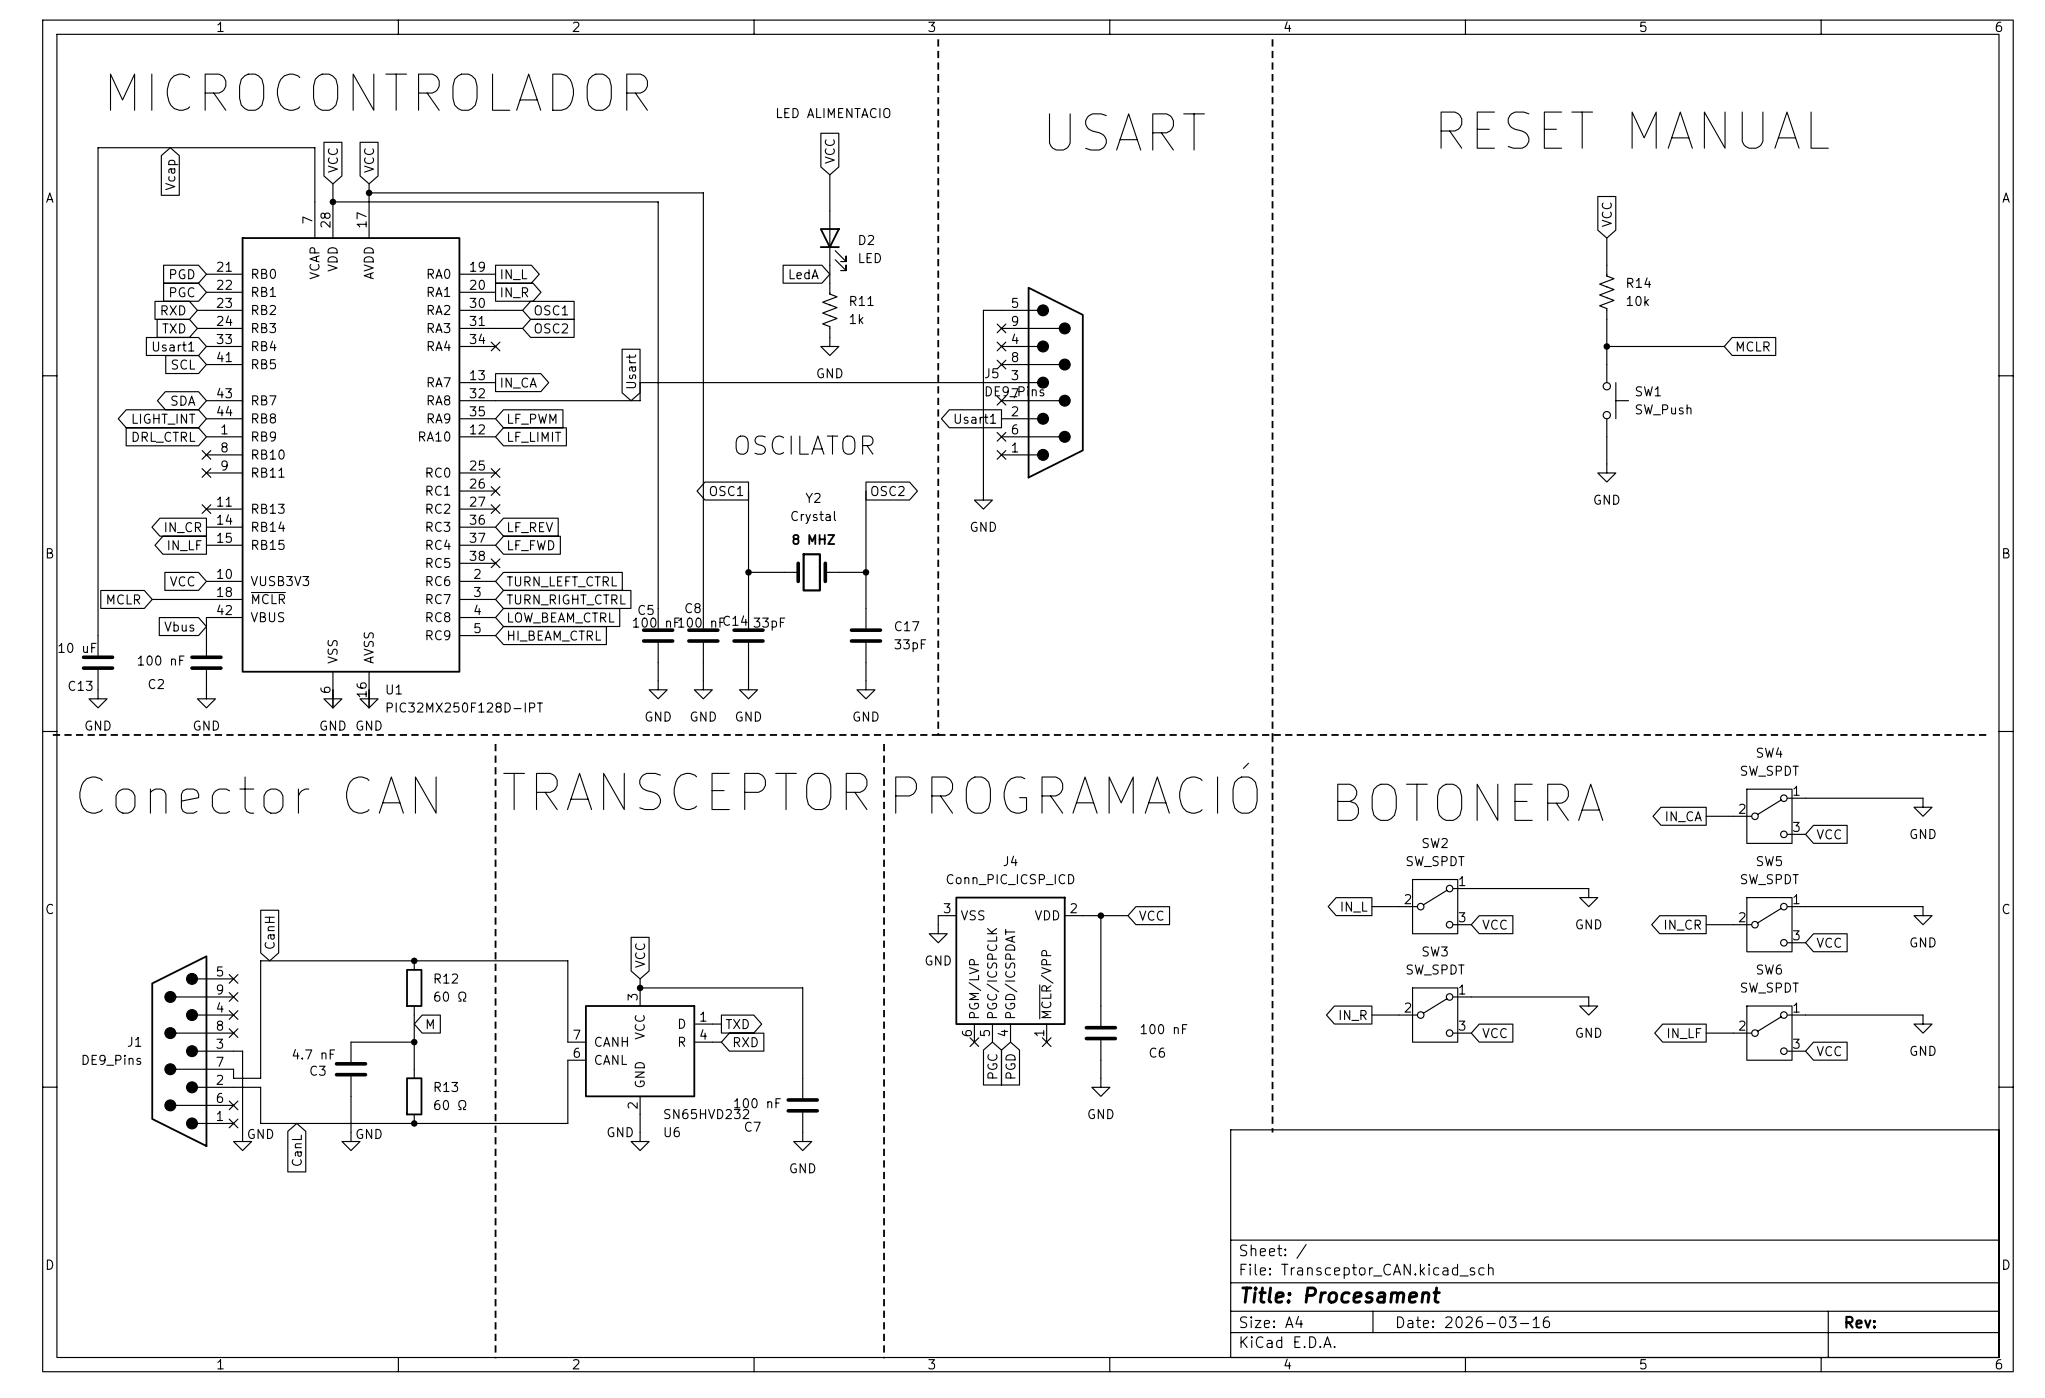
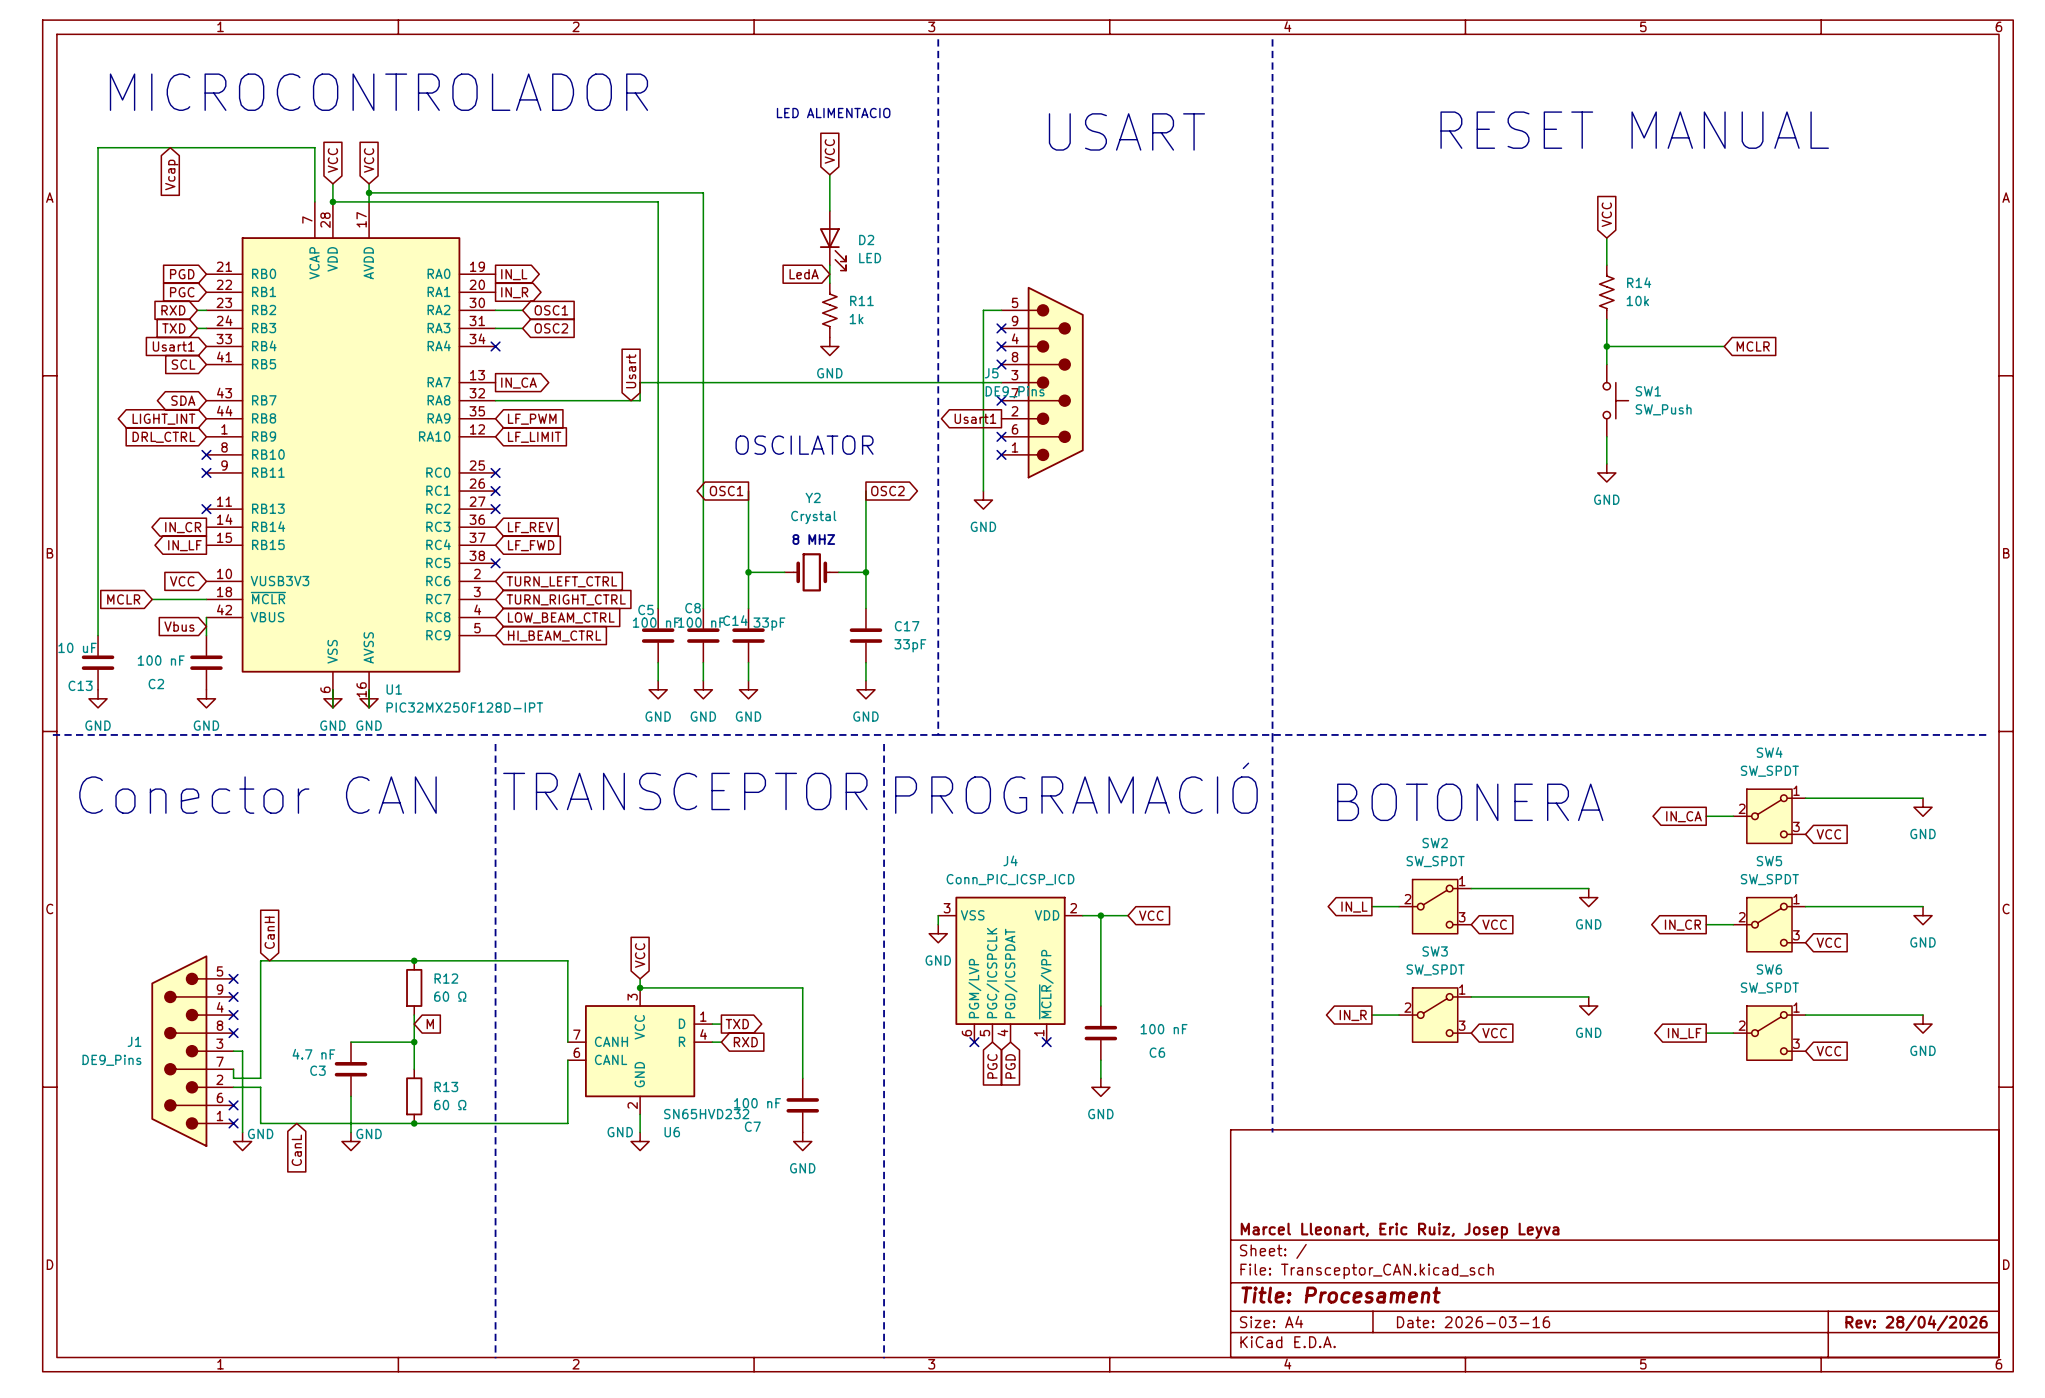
title block: none -> Marcel Lleonart, Eric Ruiz, Josep Leyva (1400, 1230)
title block: Rev: (1860, 1322) -> Rev: 28/04/2026 (1916, 1323)

